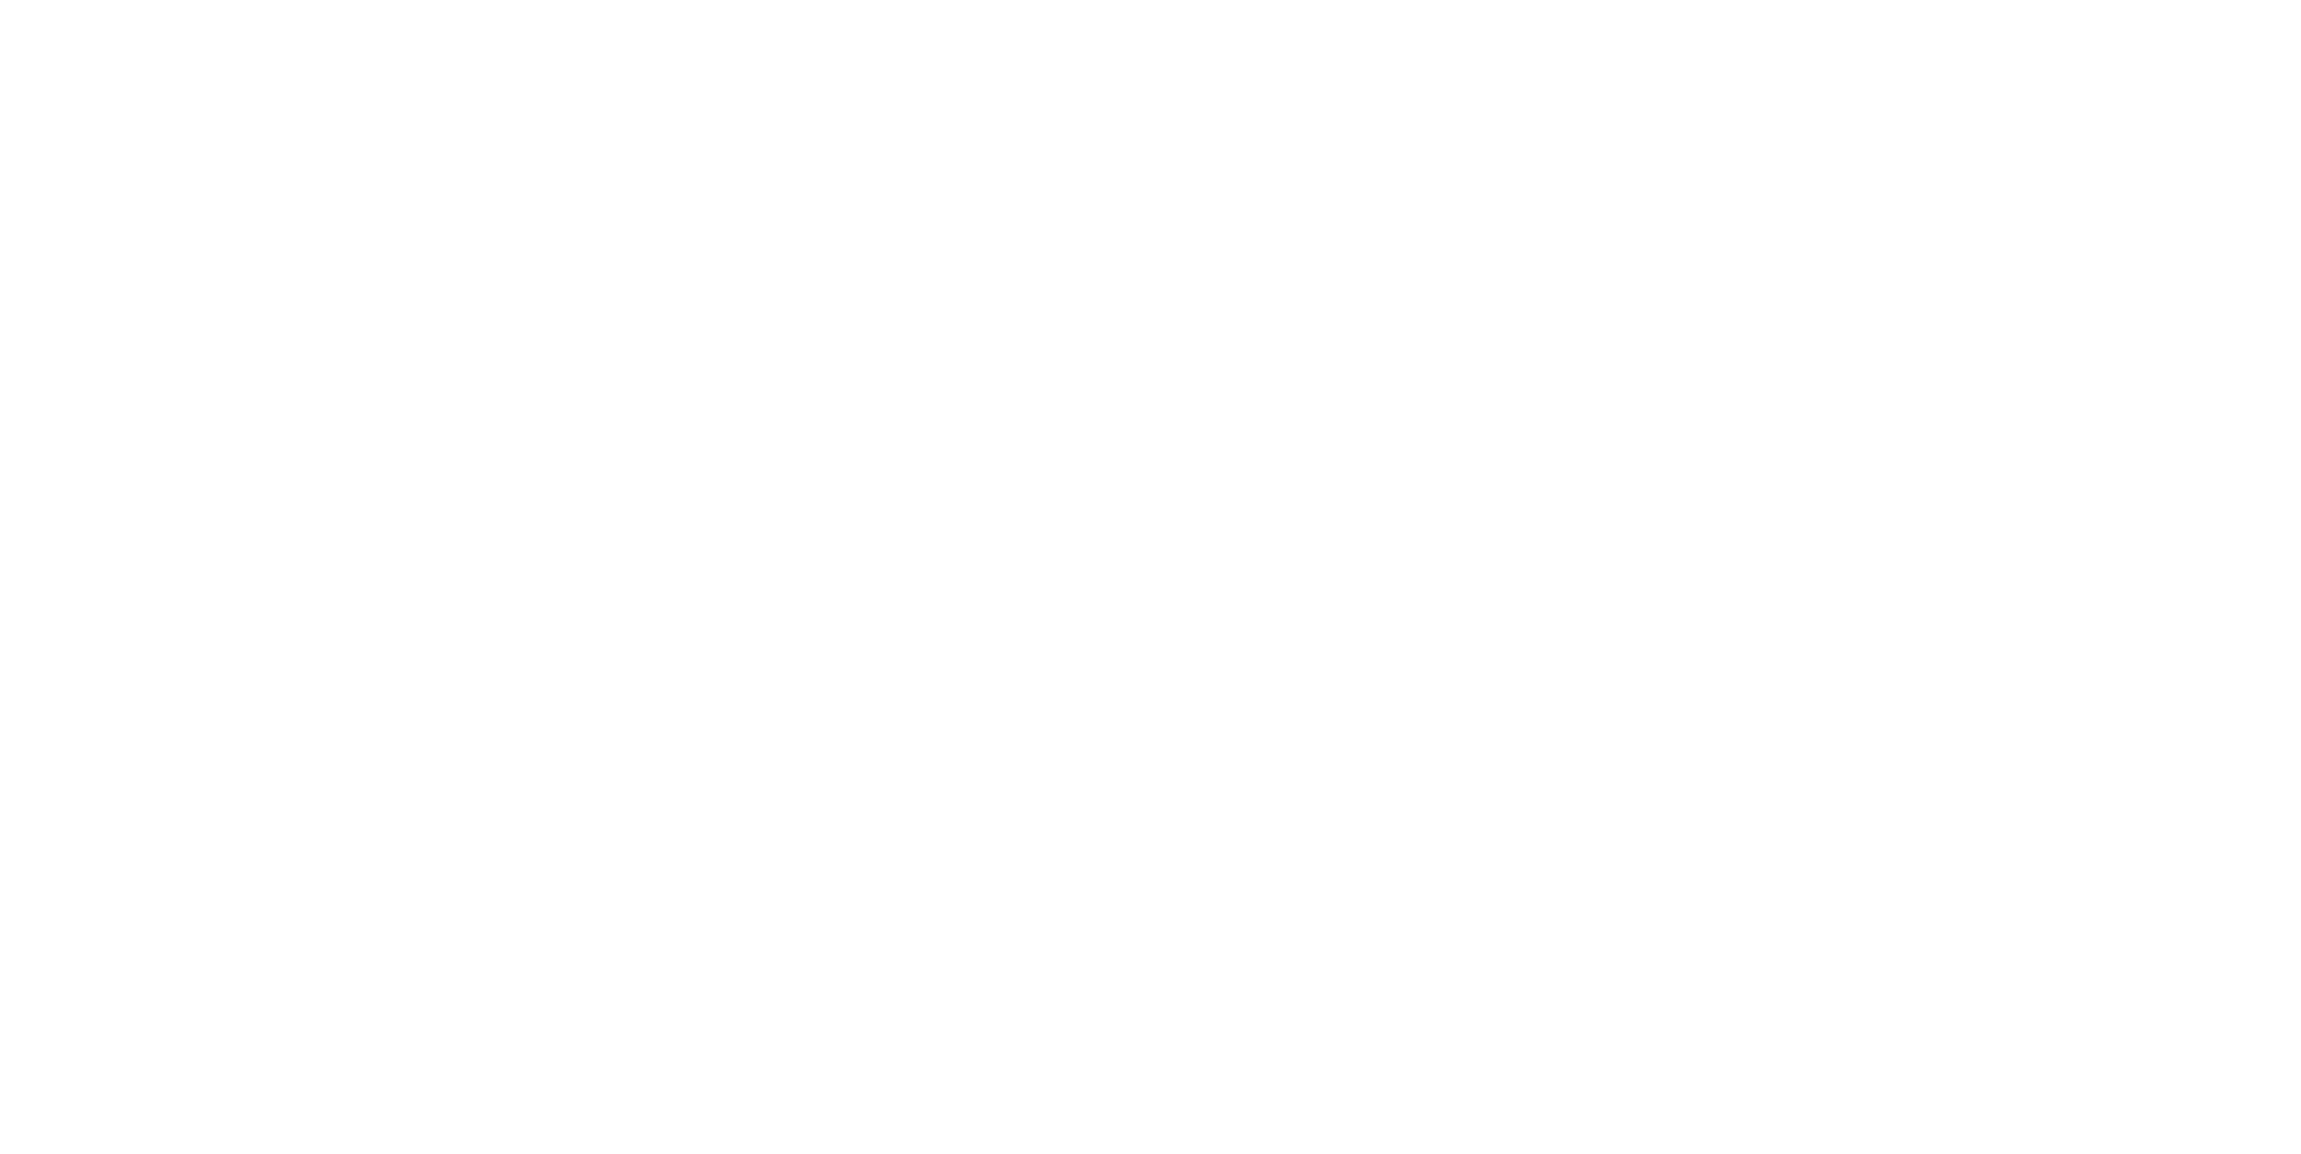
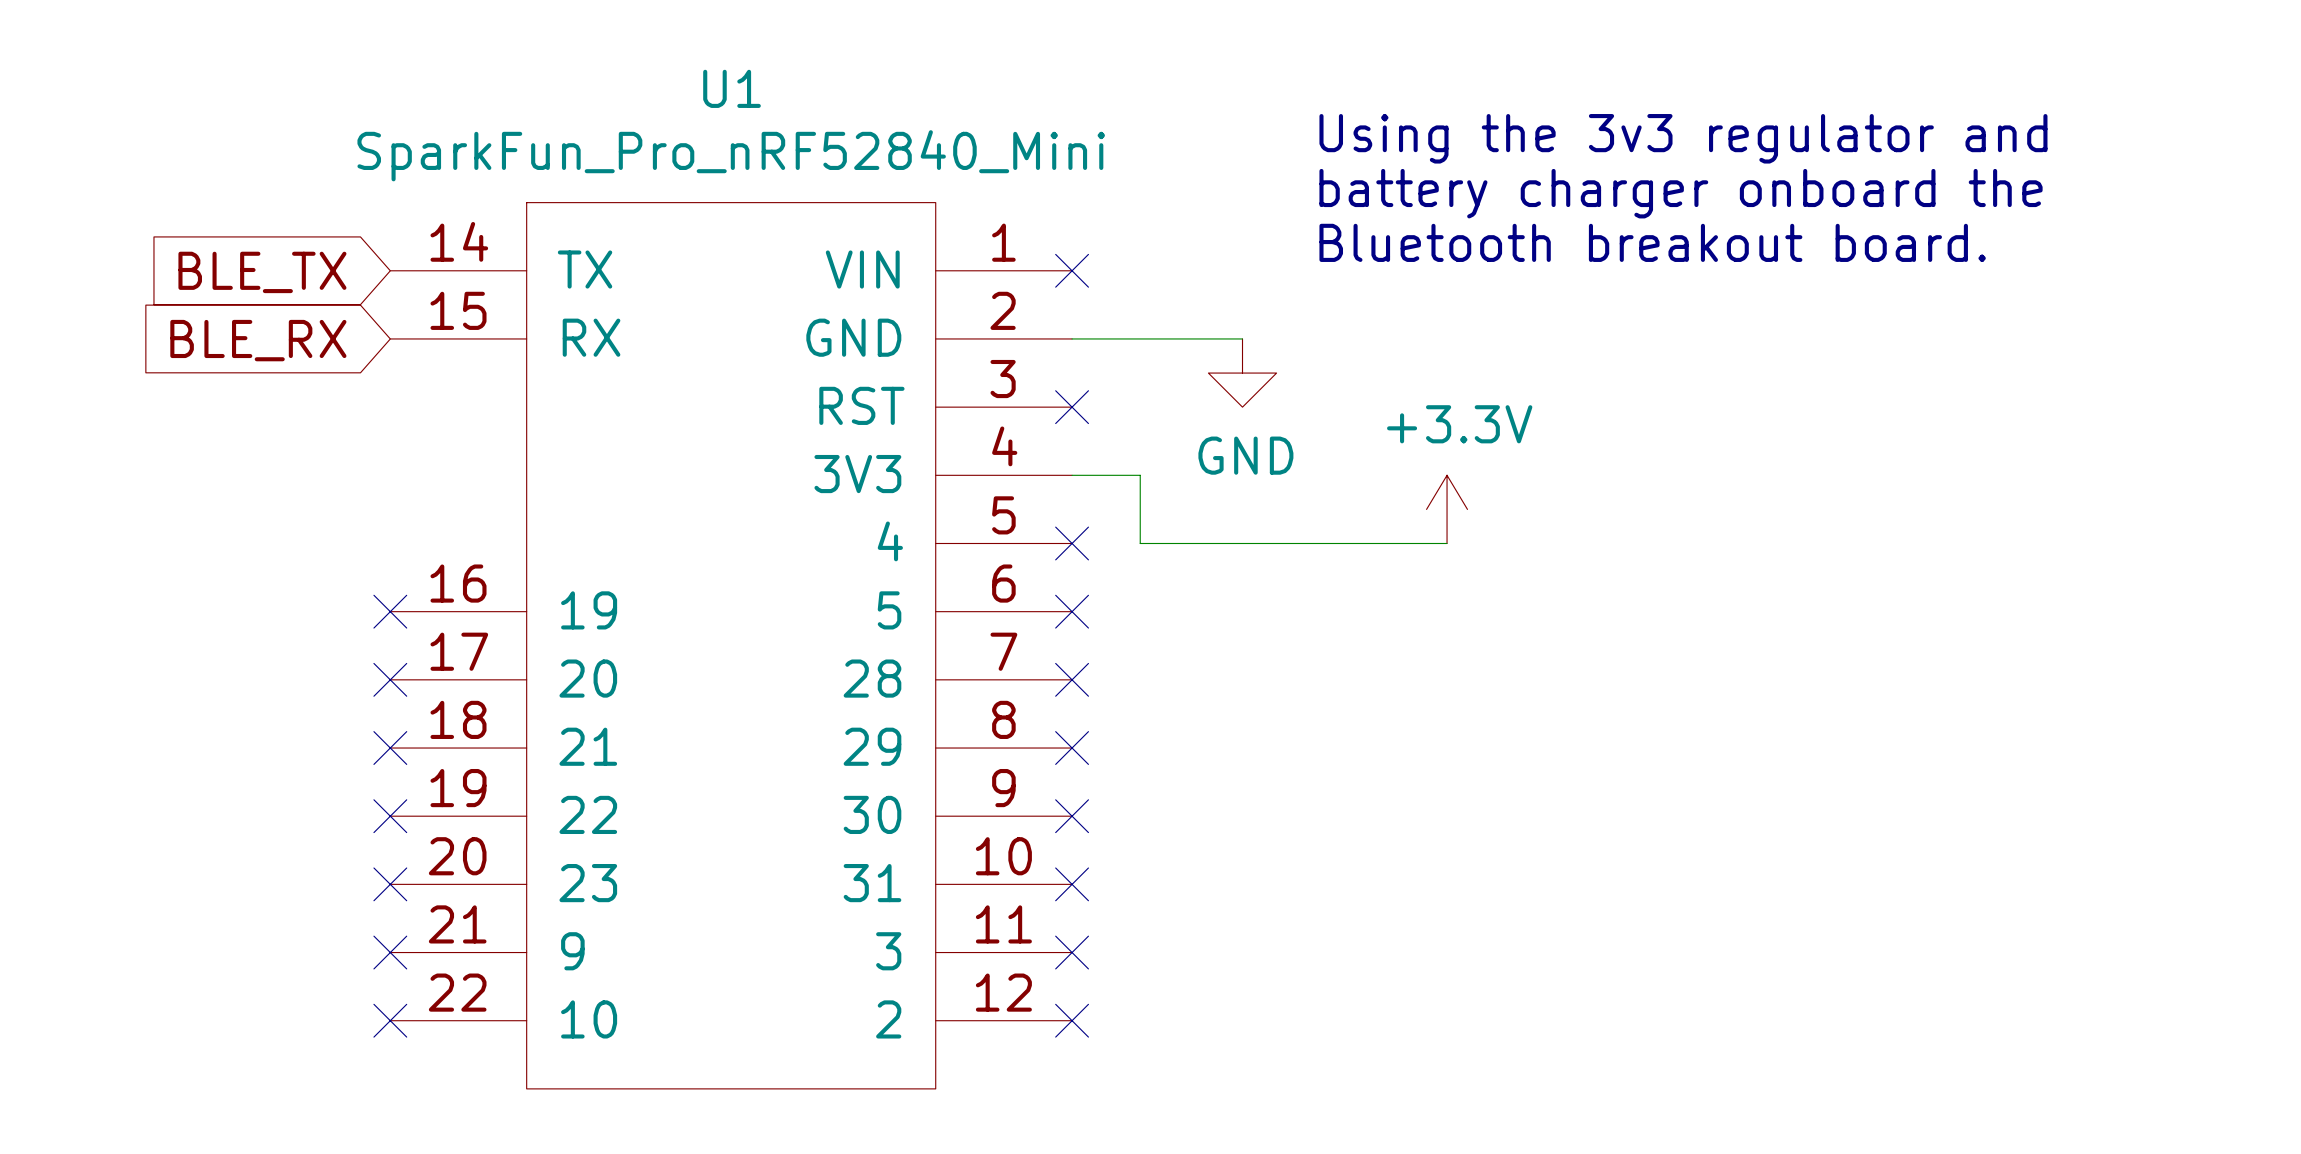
text: none -> Using the 3v3 regulator and (1683, 138)
text: none -> battery charger onboard the (1681, 193)
text: none -> Bluetooth breakout board. (1652, 242)
no-connect mark: none -> (1072, 270)
global label: none -> BLE_TX (262, 272)
wire: none -> (1072, 338) (1242, 338)
global label: none -> BLE_RX (258, 340)
power symbol: none -> GND (1242, 373)
no-connect mark: none -> (1072, 407)
wire: none -> (1072, 475) (1140, 475) (1140, 543) (1447, 543)
power symbol: none -> +3.3V (1447, 509)
no-connect mark: none -> (1072, 543)
no-connect mark: none -> (390, 611)
no-connect mark: none -> (1072, 611)
U1: none -> SparkFun_Pro_nRF52840_Mini (731, 645)
no-connect mark: none -> (390, 679)
no-connect mark: none -> (1072, 679)
no-connect mark: none -> (390, 748)
no-connect mark: none -> (1072, 748)
no-connect mark: none -> (390, 816)
no-connect mark: none -> (1072, 816)
no-connect mark: none -> (390, 884)
no-connect mark: none -> (1072, 884)
no-connect mark: none -> (390, 952)
no-connect mark: none -> (1072, 952)
no-connect mark: none -> (390, 1020)
no-connect mark: none -> (1072, 1020)

